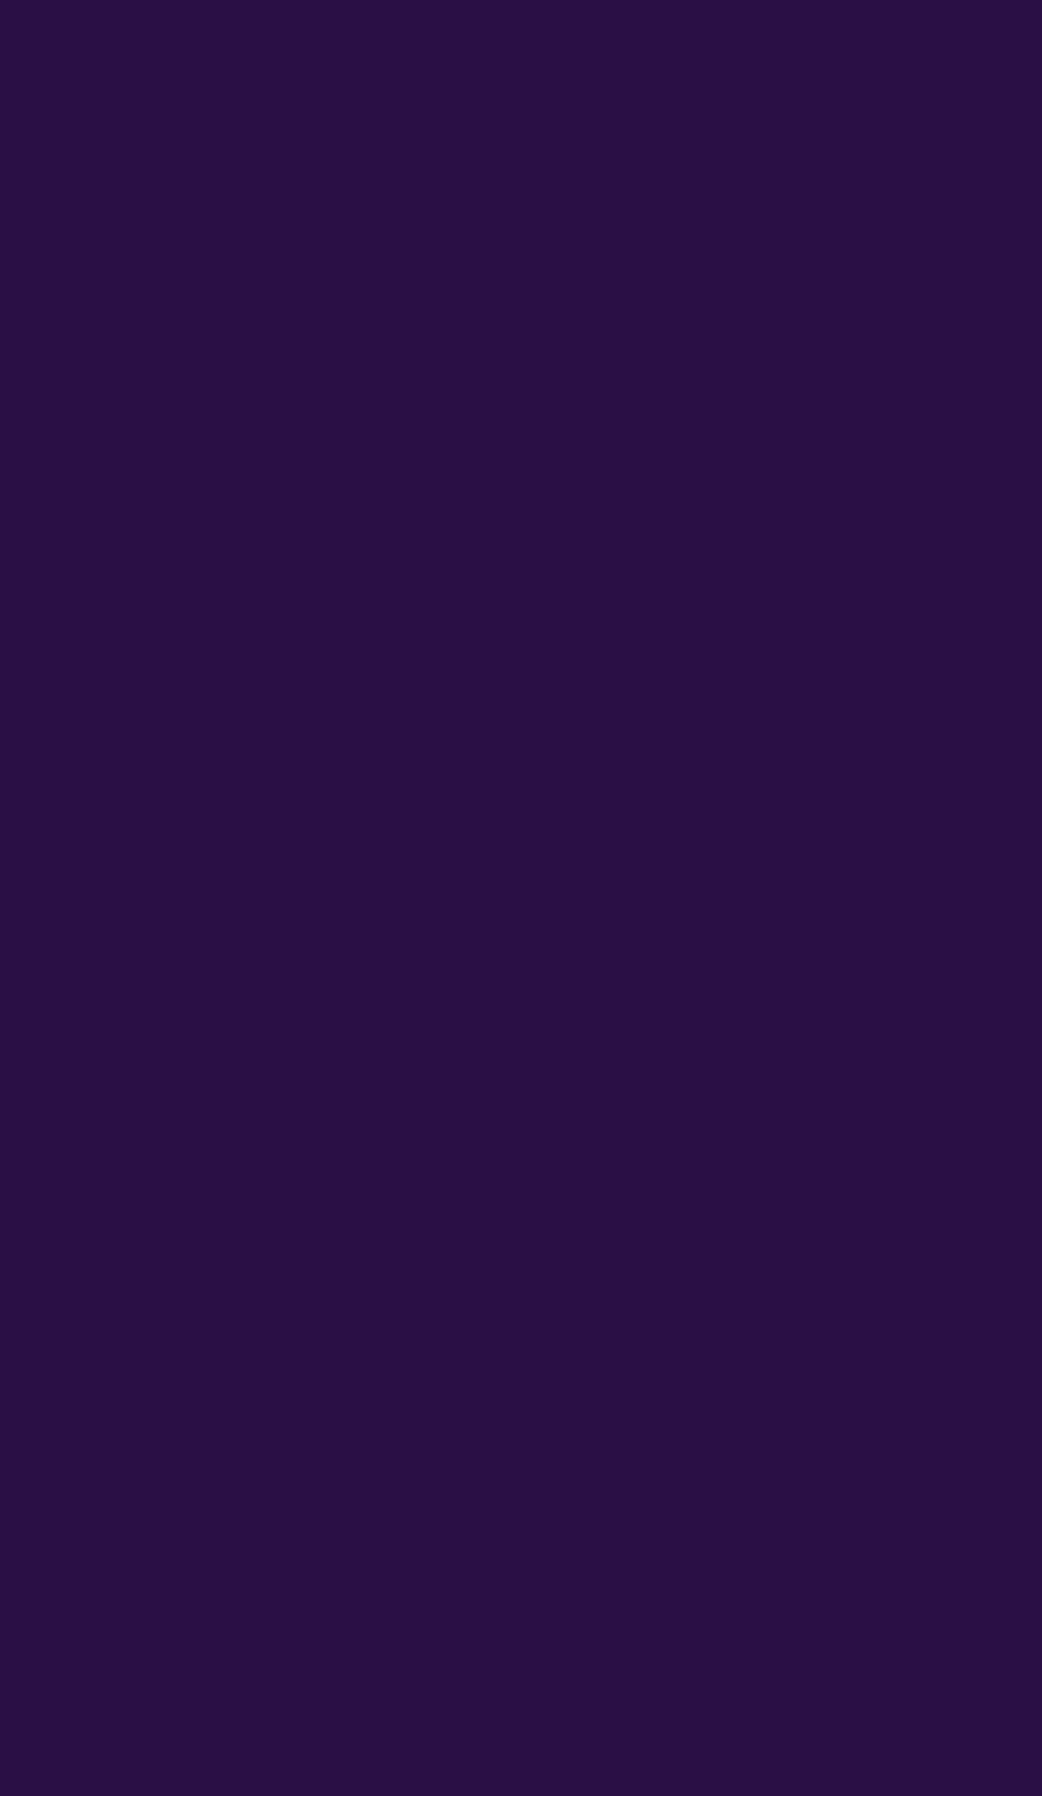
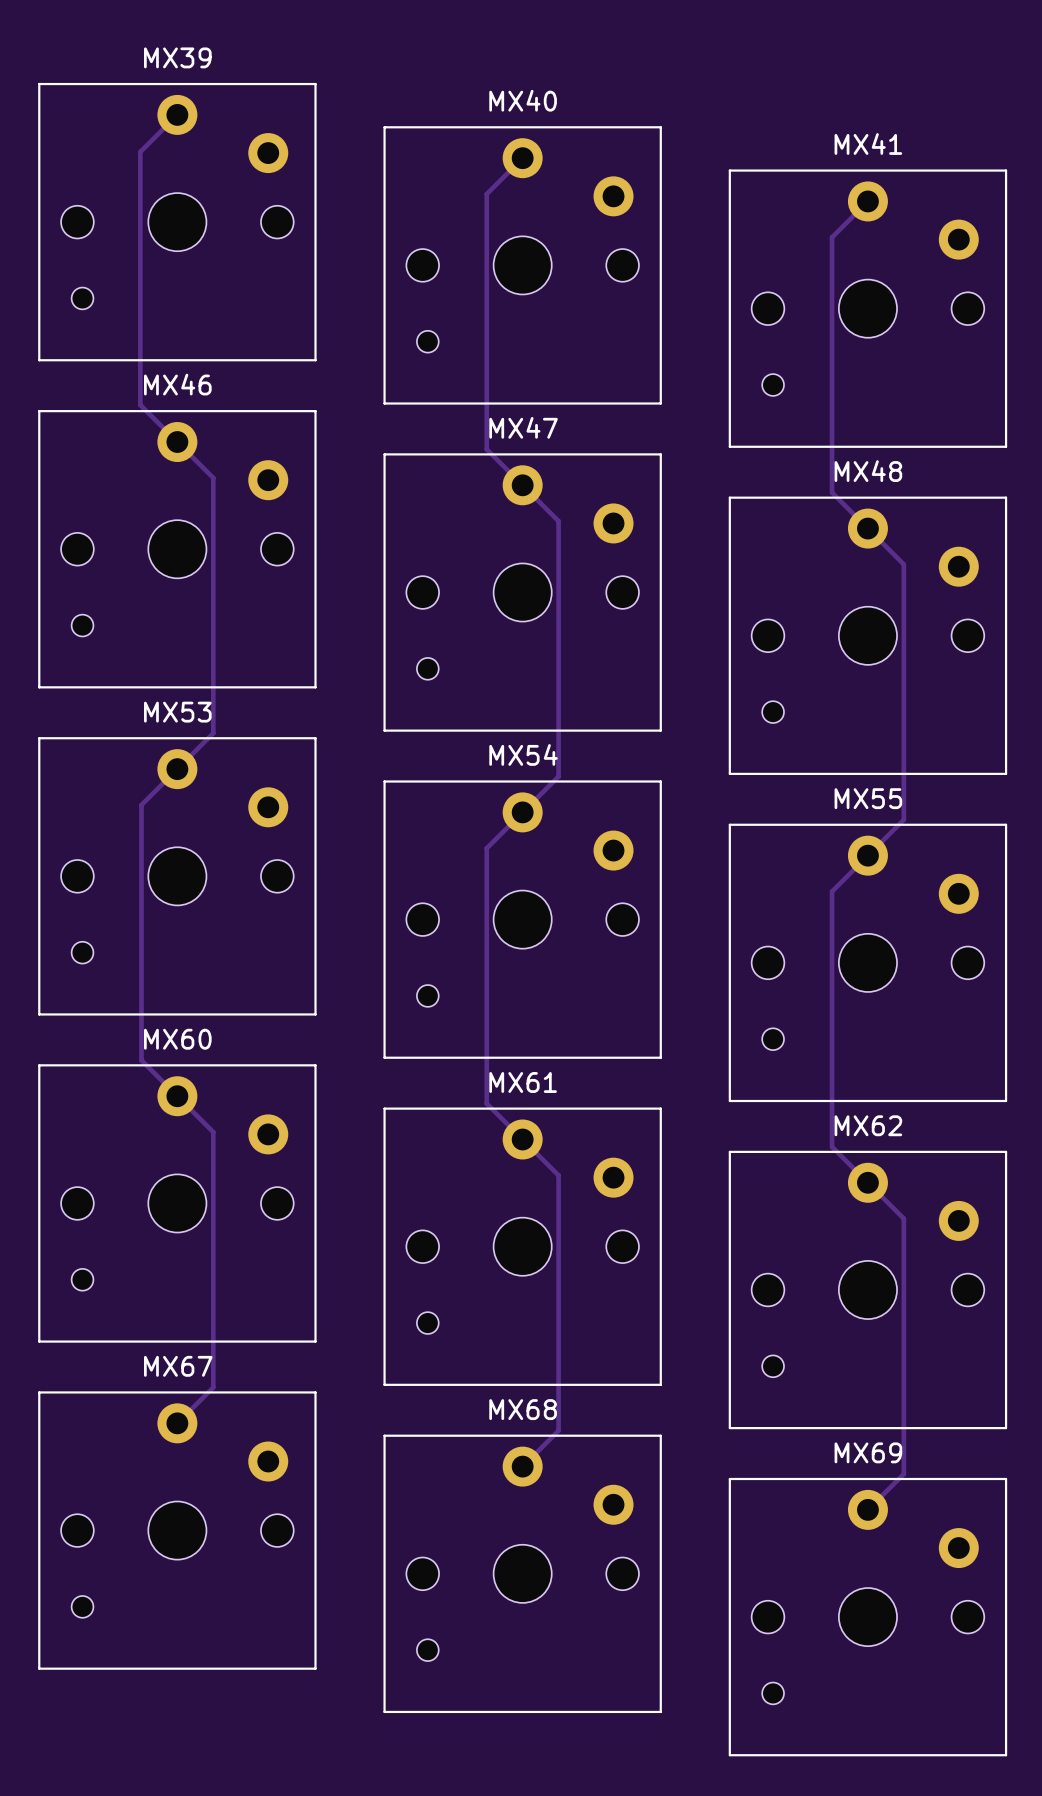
track: none -> (177, 114) (140, 151) (140, 404) (213, 477) (213, 733) (141, 805) (141, 1060) (213, 1132) (213, 1387) (177, 1423)
track: none -> (522, 158) (486, 194) (486, 449) (558, 521) (558, 776) (486, 848) (486, 1103) (558, 1175) (558, 1430) (522, 1466)
track: none -> (867, 201) (832, 237) (832, 492) (903, 564) (903, 819) (832, 891) (832, 1146) (903, 1218) (903, 1473) (867, 1509)
MX39: none -> (177, 222)
MX40: none -> (522, 265)
MX41: none -> (867, 308)
MX46: none -> (177, 549)
MX47: none -> (522, 592)
MX48: none -> (867, 635)
MX53: none -> (177, 876)
MX54: none -> (522, 919)
MX55: none -> (867, 962)
MX60: none -> (177, 1203)
MX61: none -> (522, 1246)
MX62: none -> (867, 1289)
MX67: none -> (177, 1530)
MX68: none -> (522, 1573)
MX69: none -> (867, 1617)

